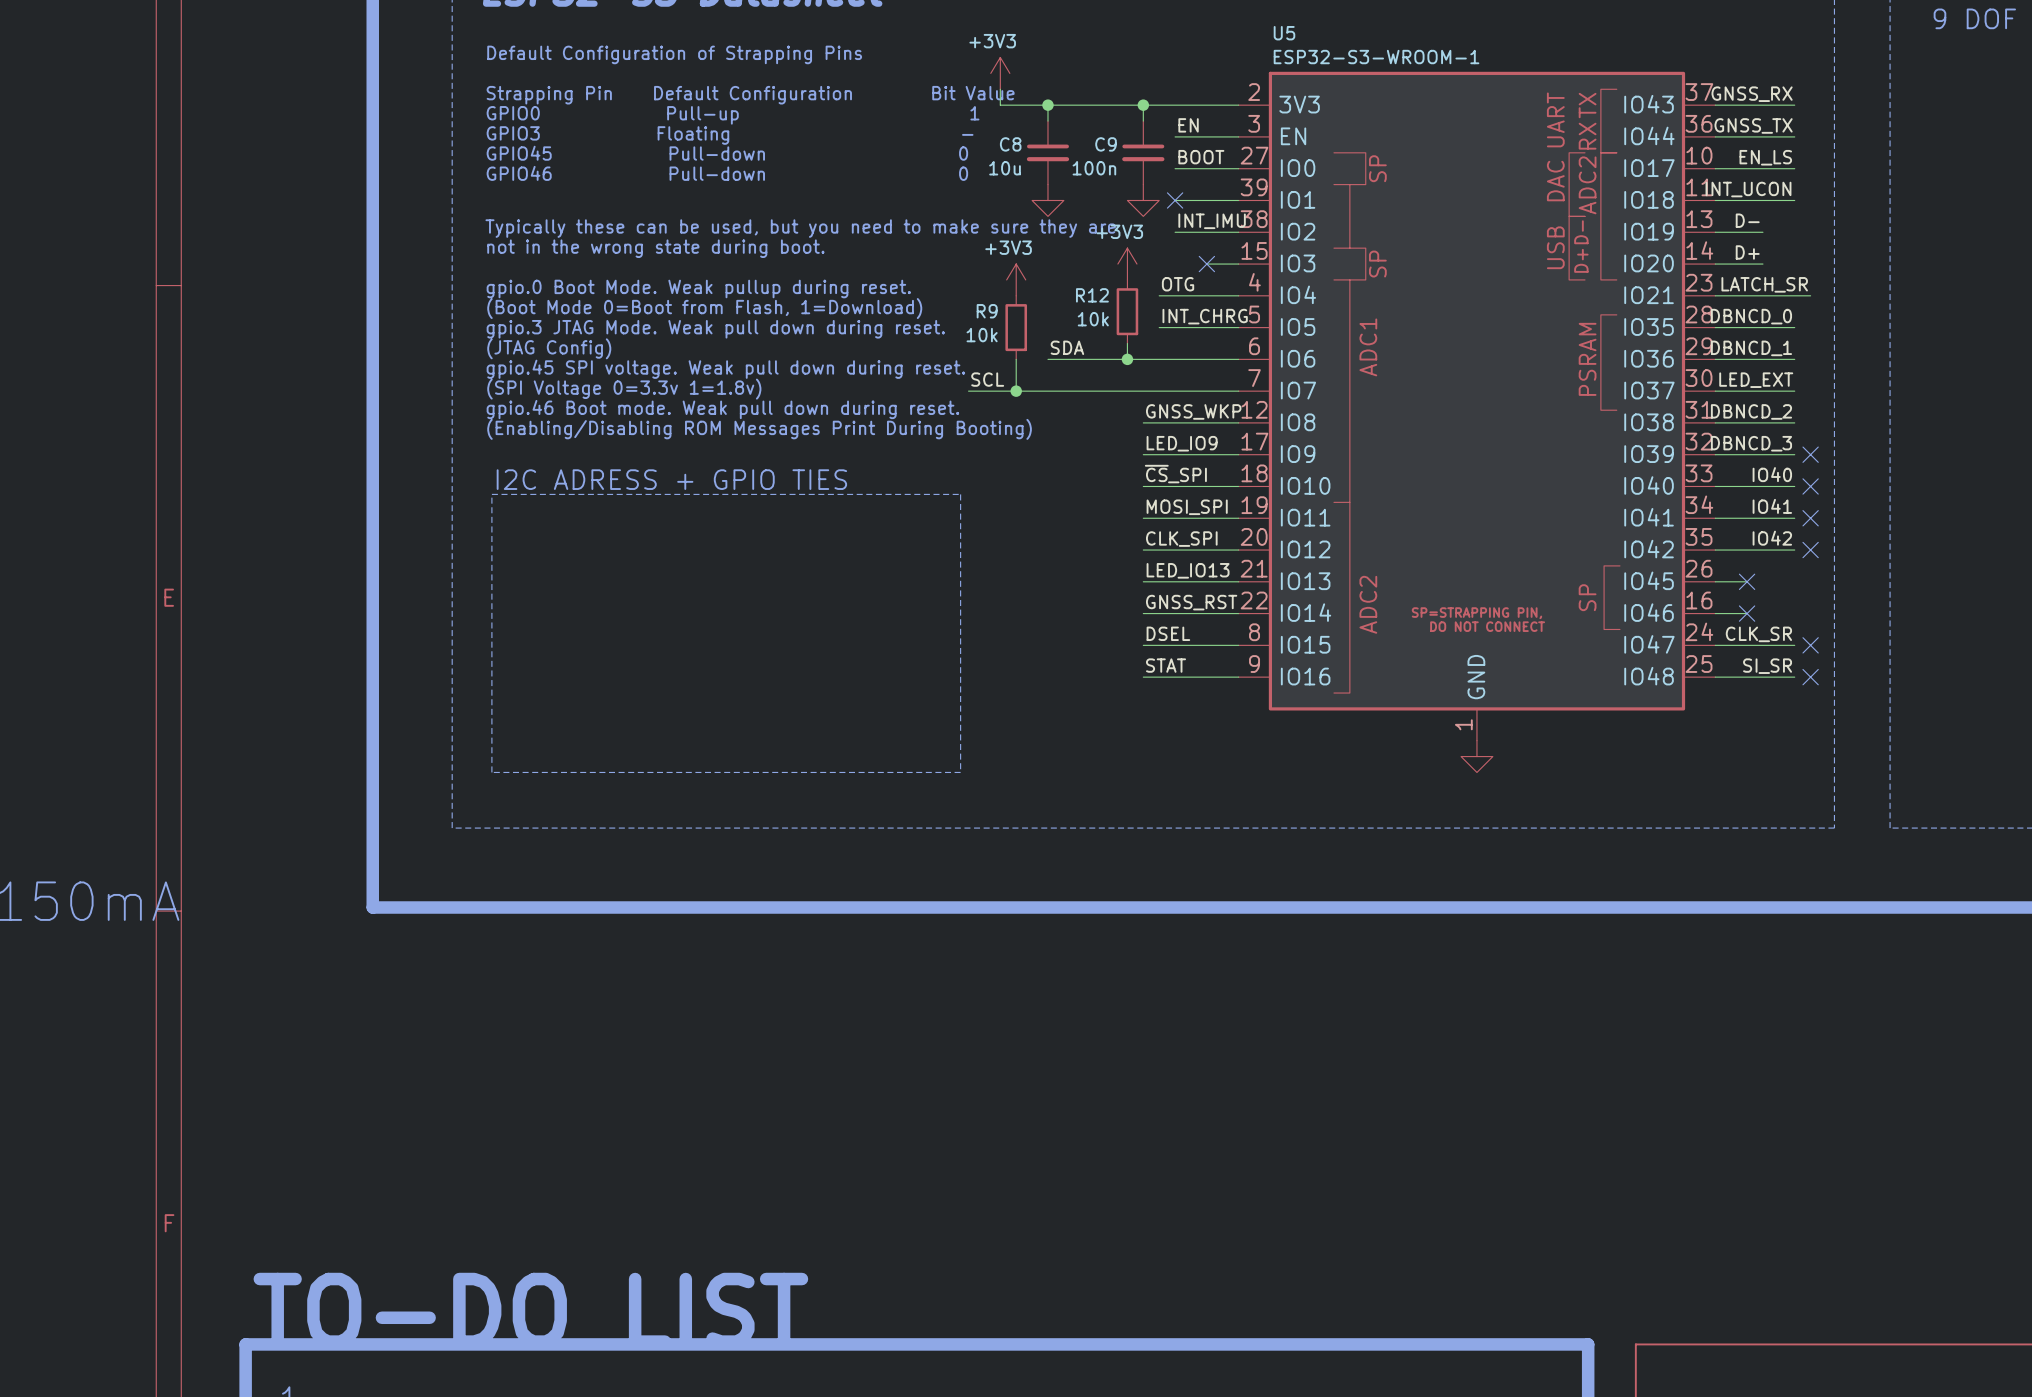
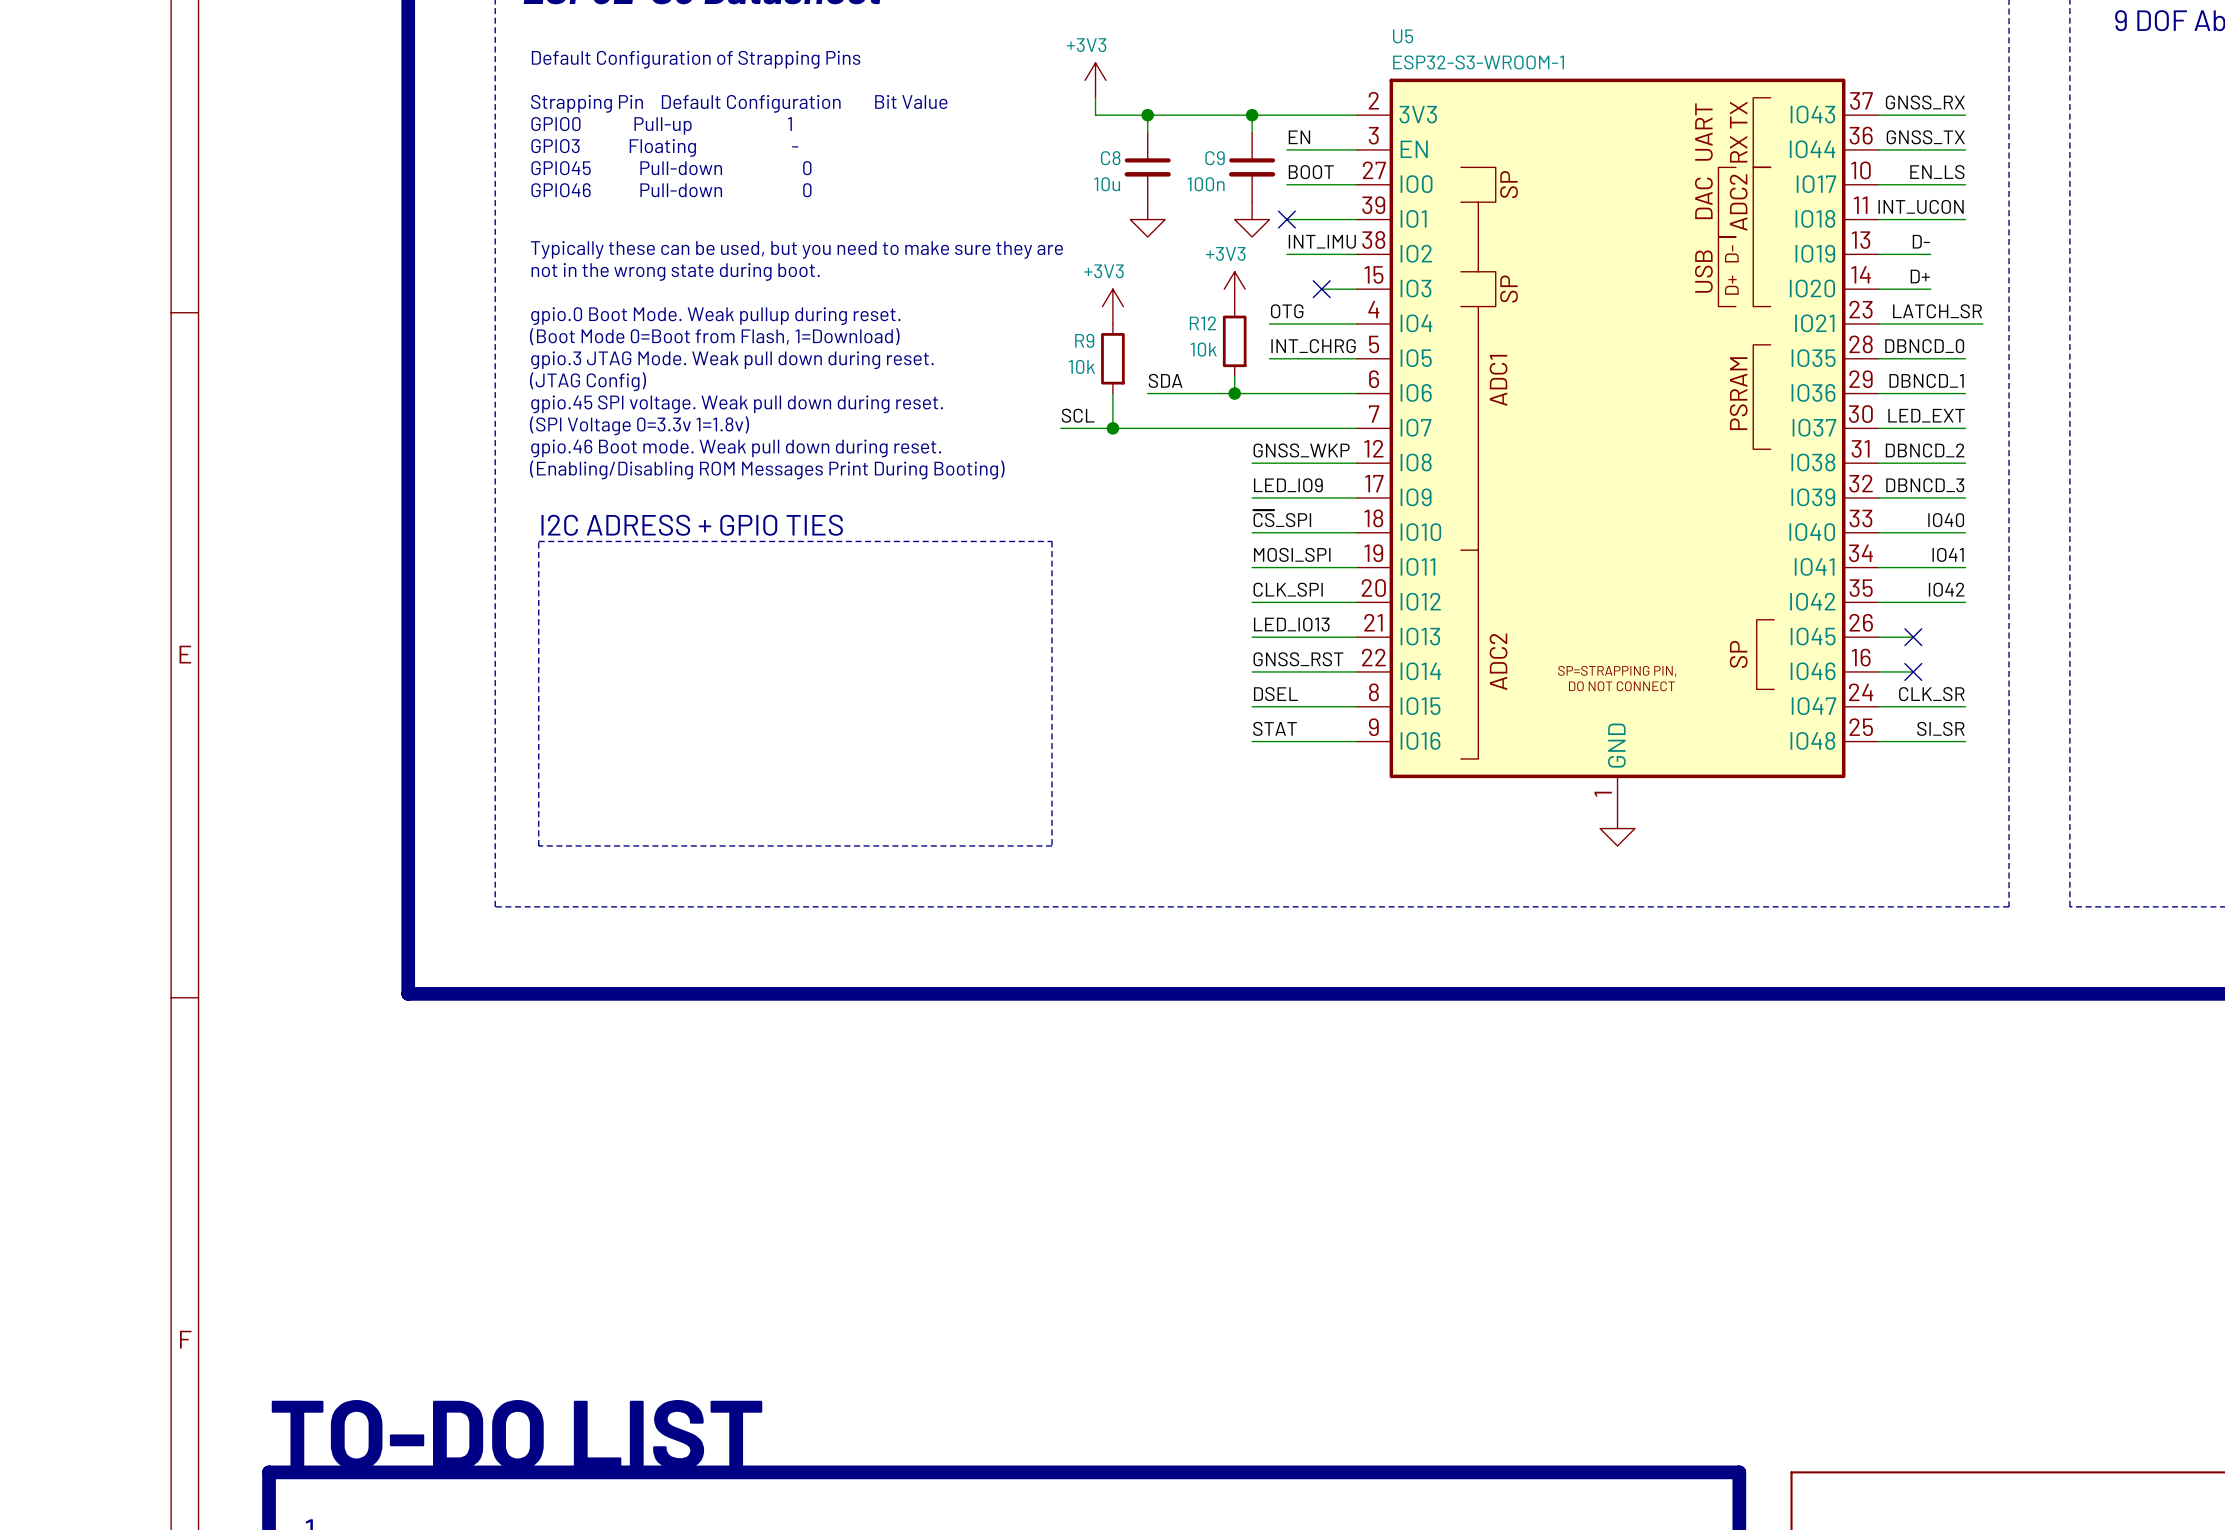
no-connect mark: (1810, 454) -> none
no-connect mark: (1810, 486) -> none
no-connect mark: (1810, 518) -> none
no-connect mark: (1810, 550) -> none
no-connect mark: (1810, 645) -> none
no-connect mark: (1810, 677) -> none

